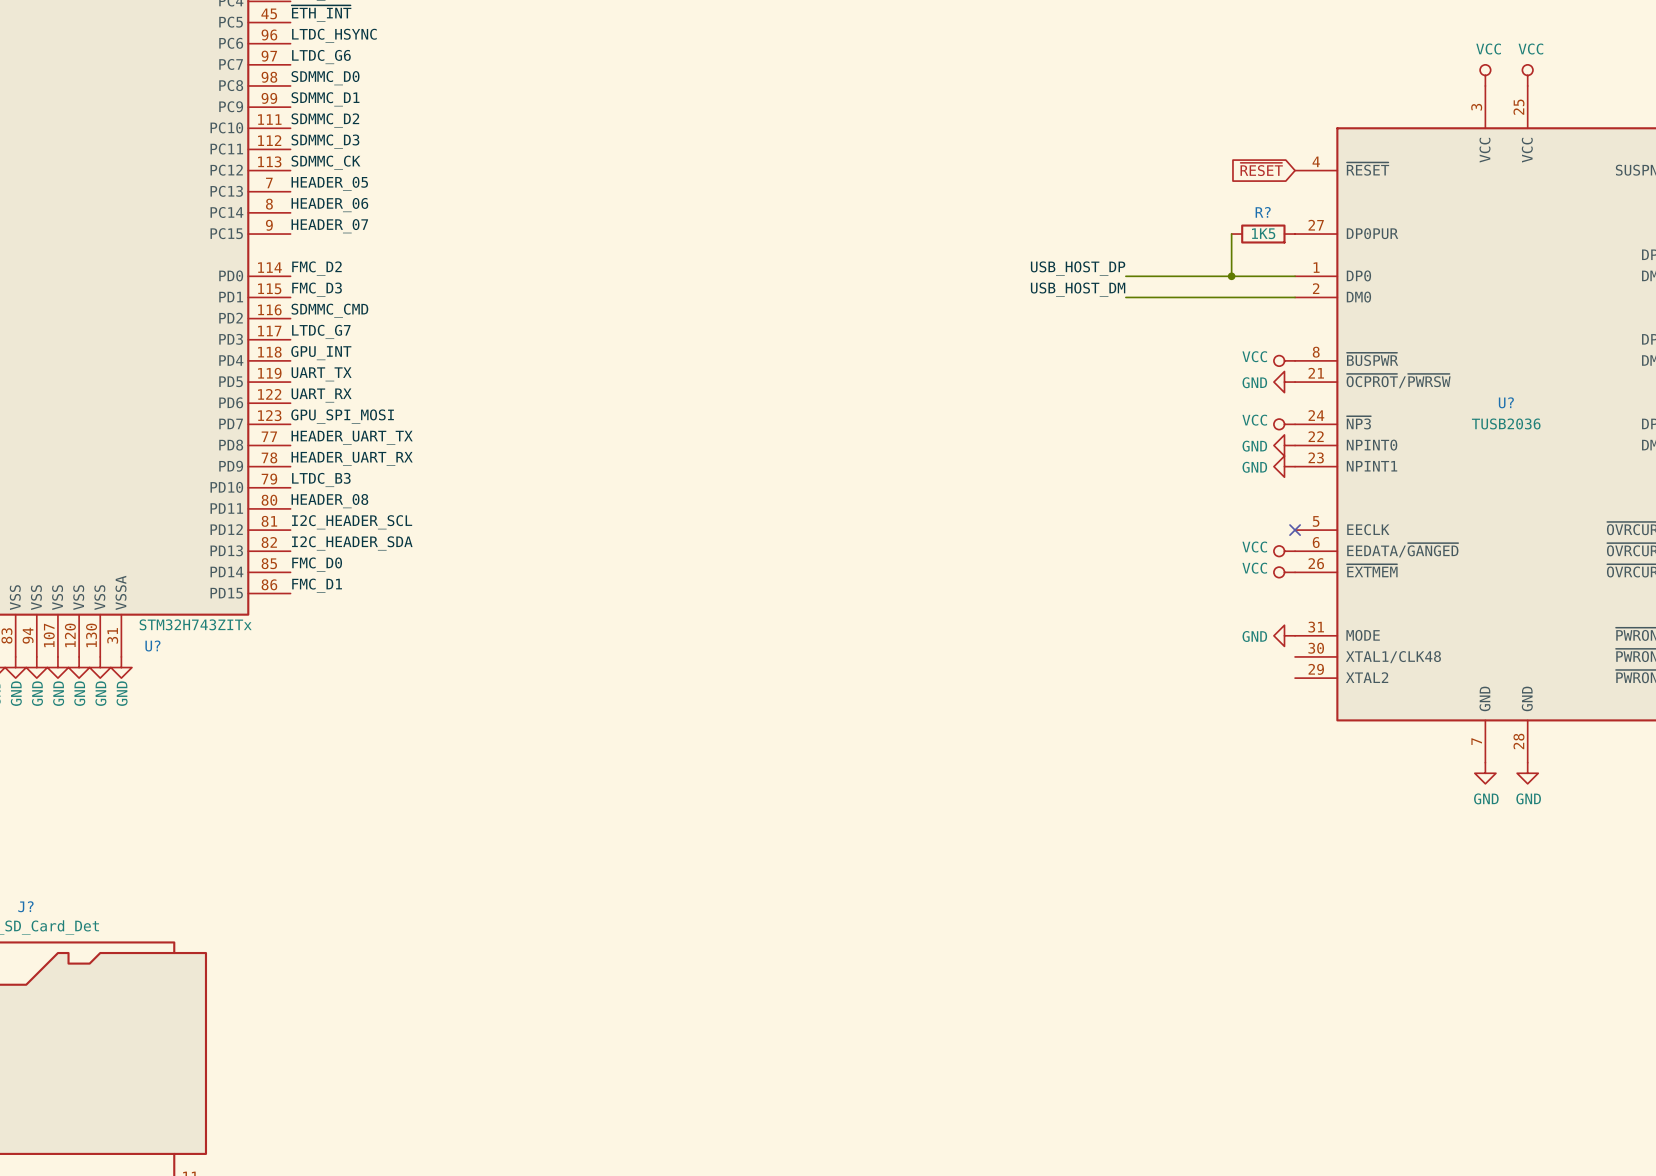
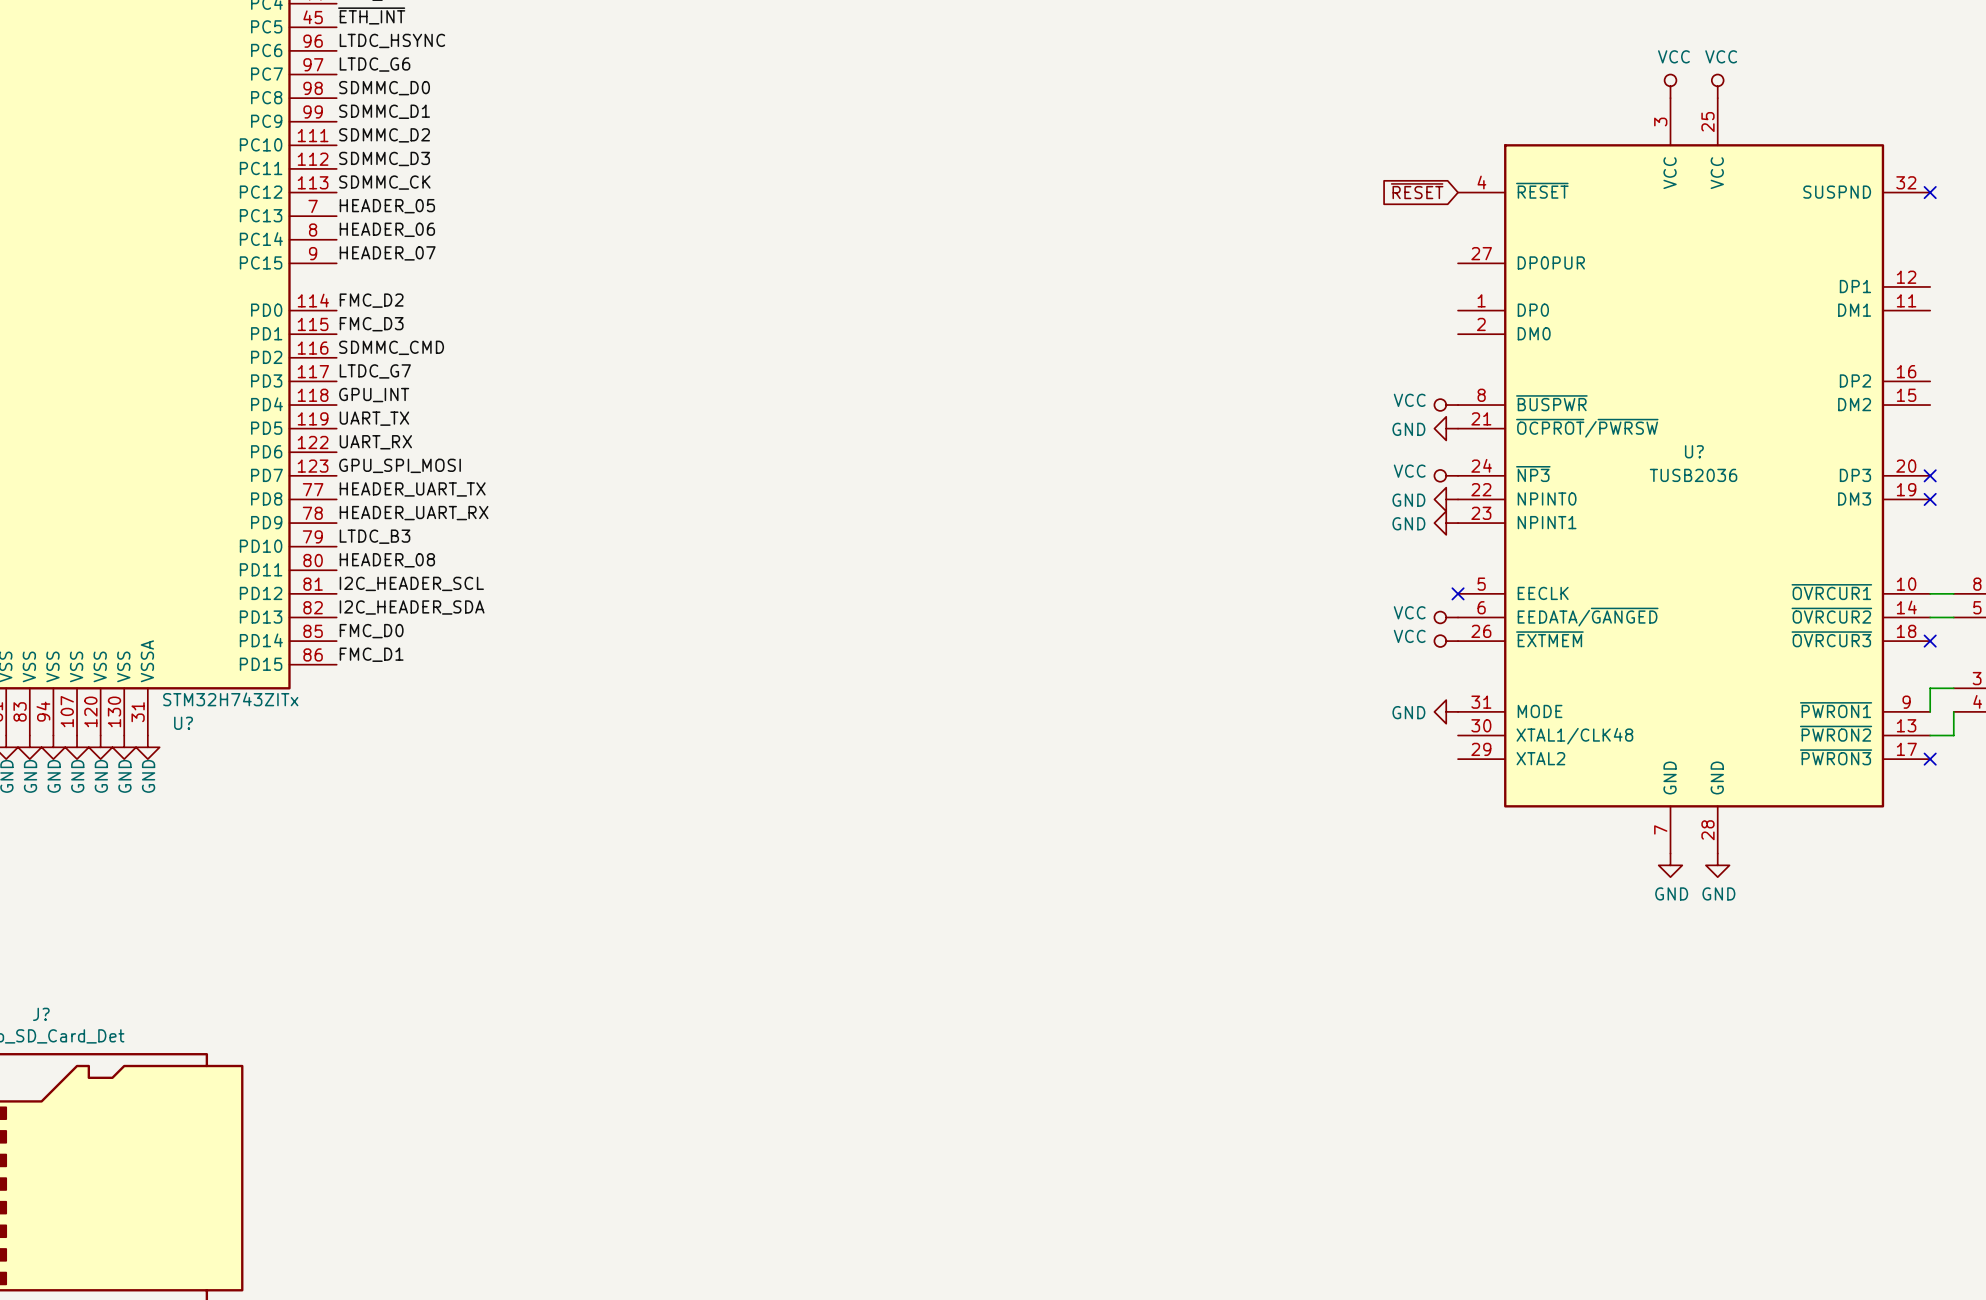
wire: (1231, 234) (1231, 276) -> none
R?: 1K5 (1263, 234) -> none
label: USB_HOST_DP (1078, 268) -> none
wire: (1125, 276) (1295, 276) -> none
junction: (1231, 276) -> none
label: USB_HOST_DM (1078, 289) -> none
wire: (1125, 297) (1295, 297) -> none

